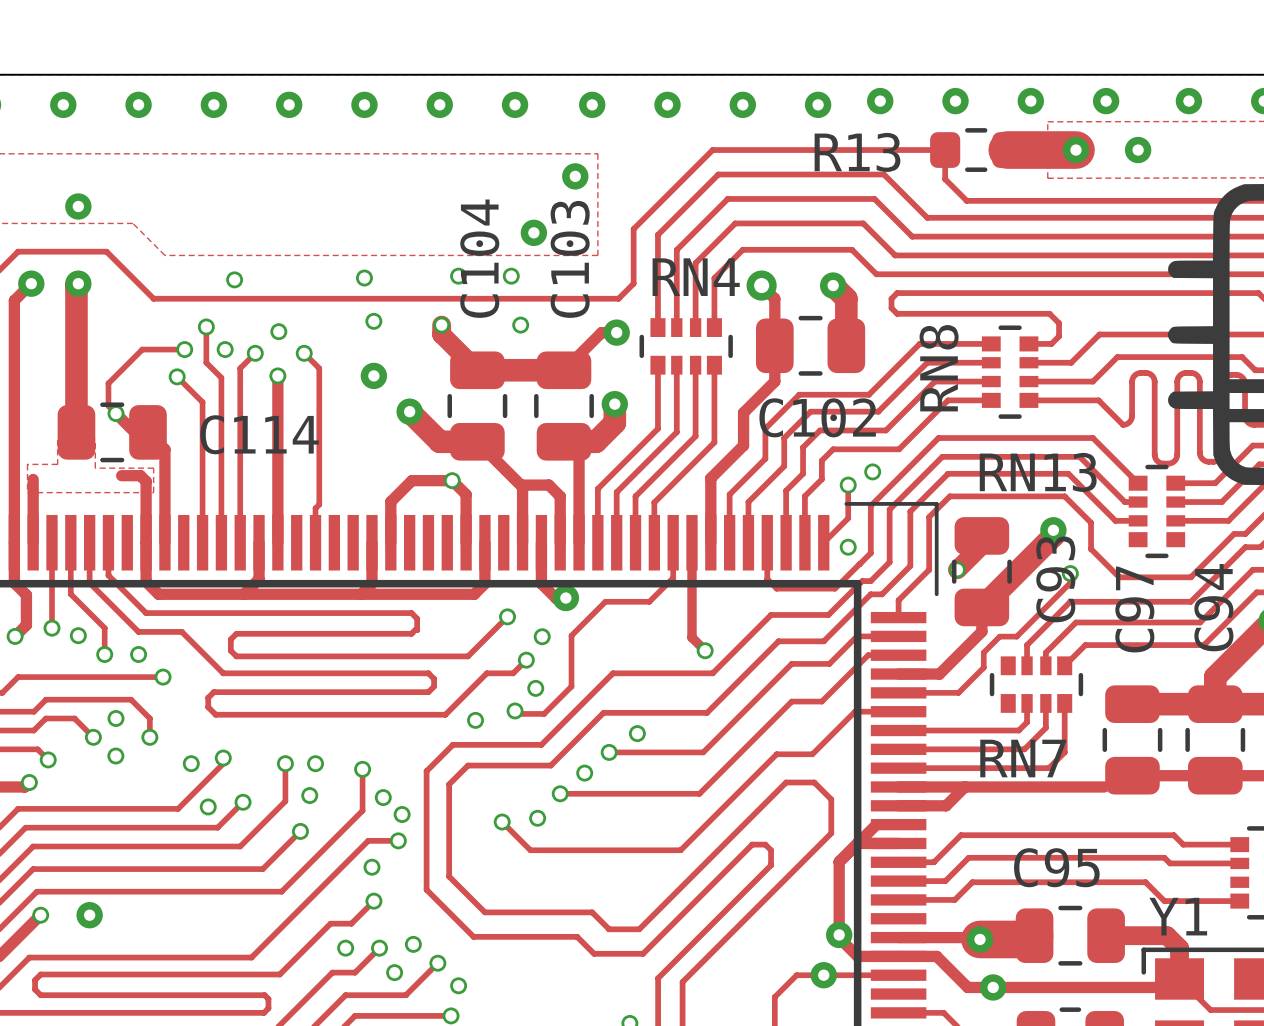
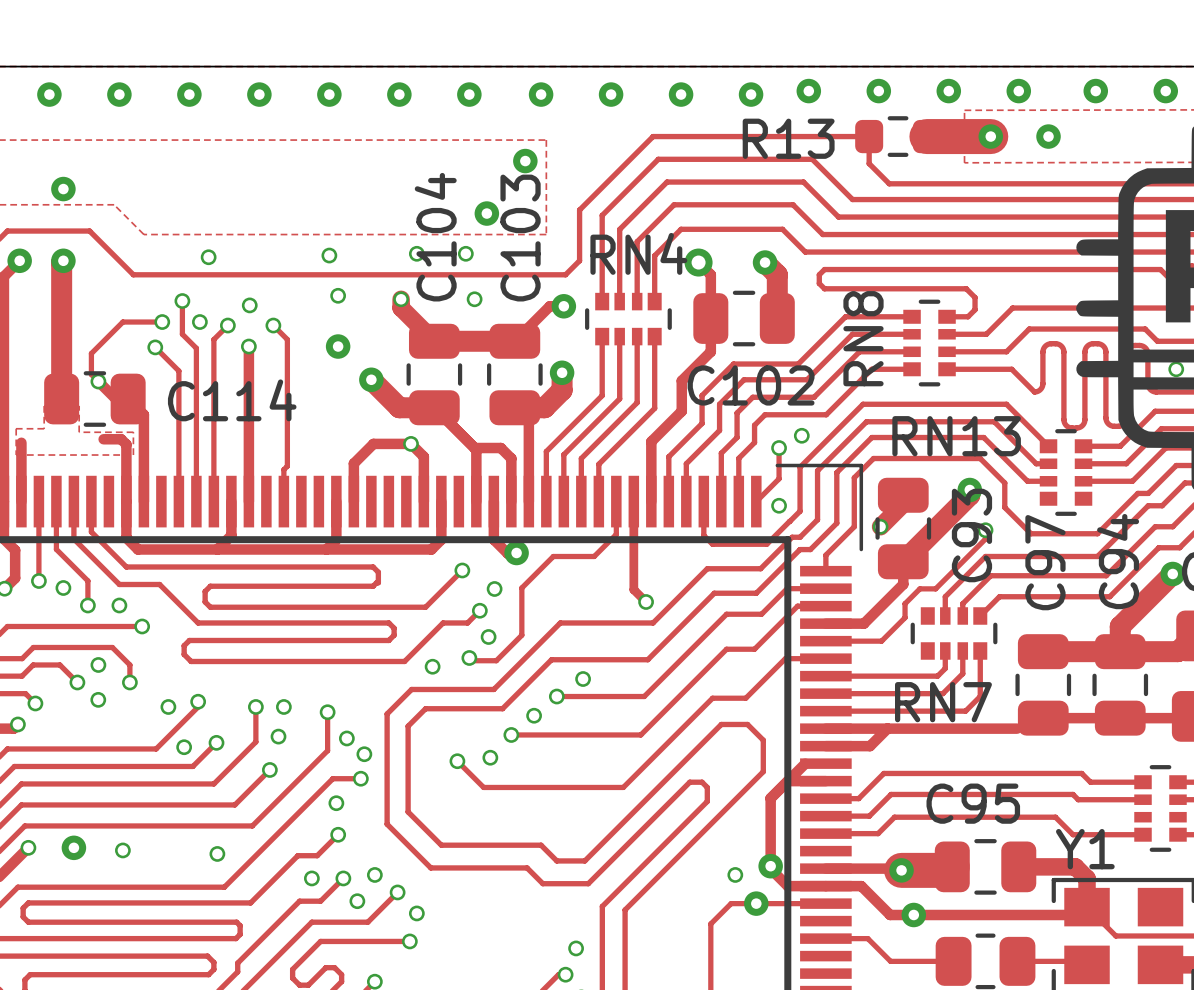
via: none -> (122, 850)
via: none -> (217, 853)
via: none -> (735, 874)

